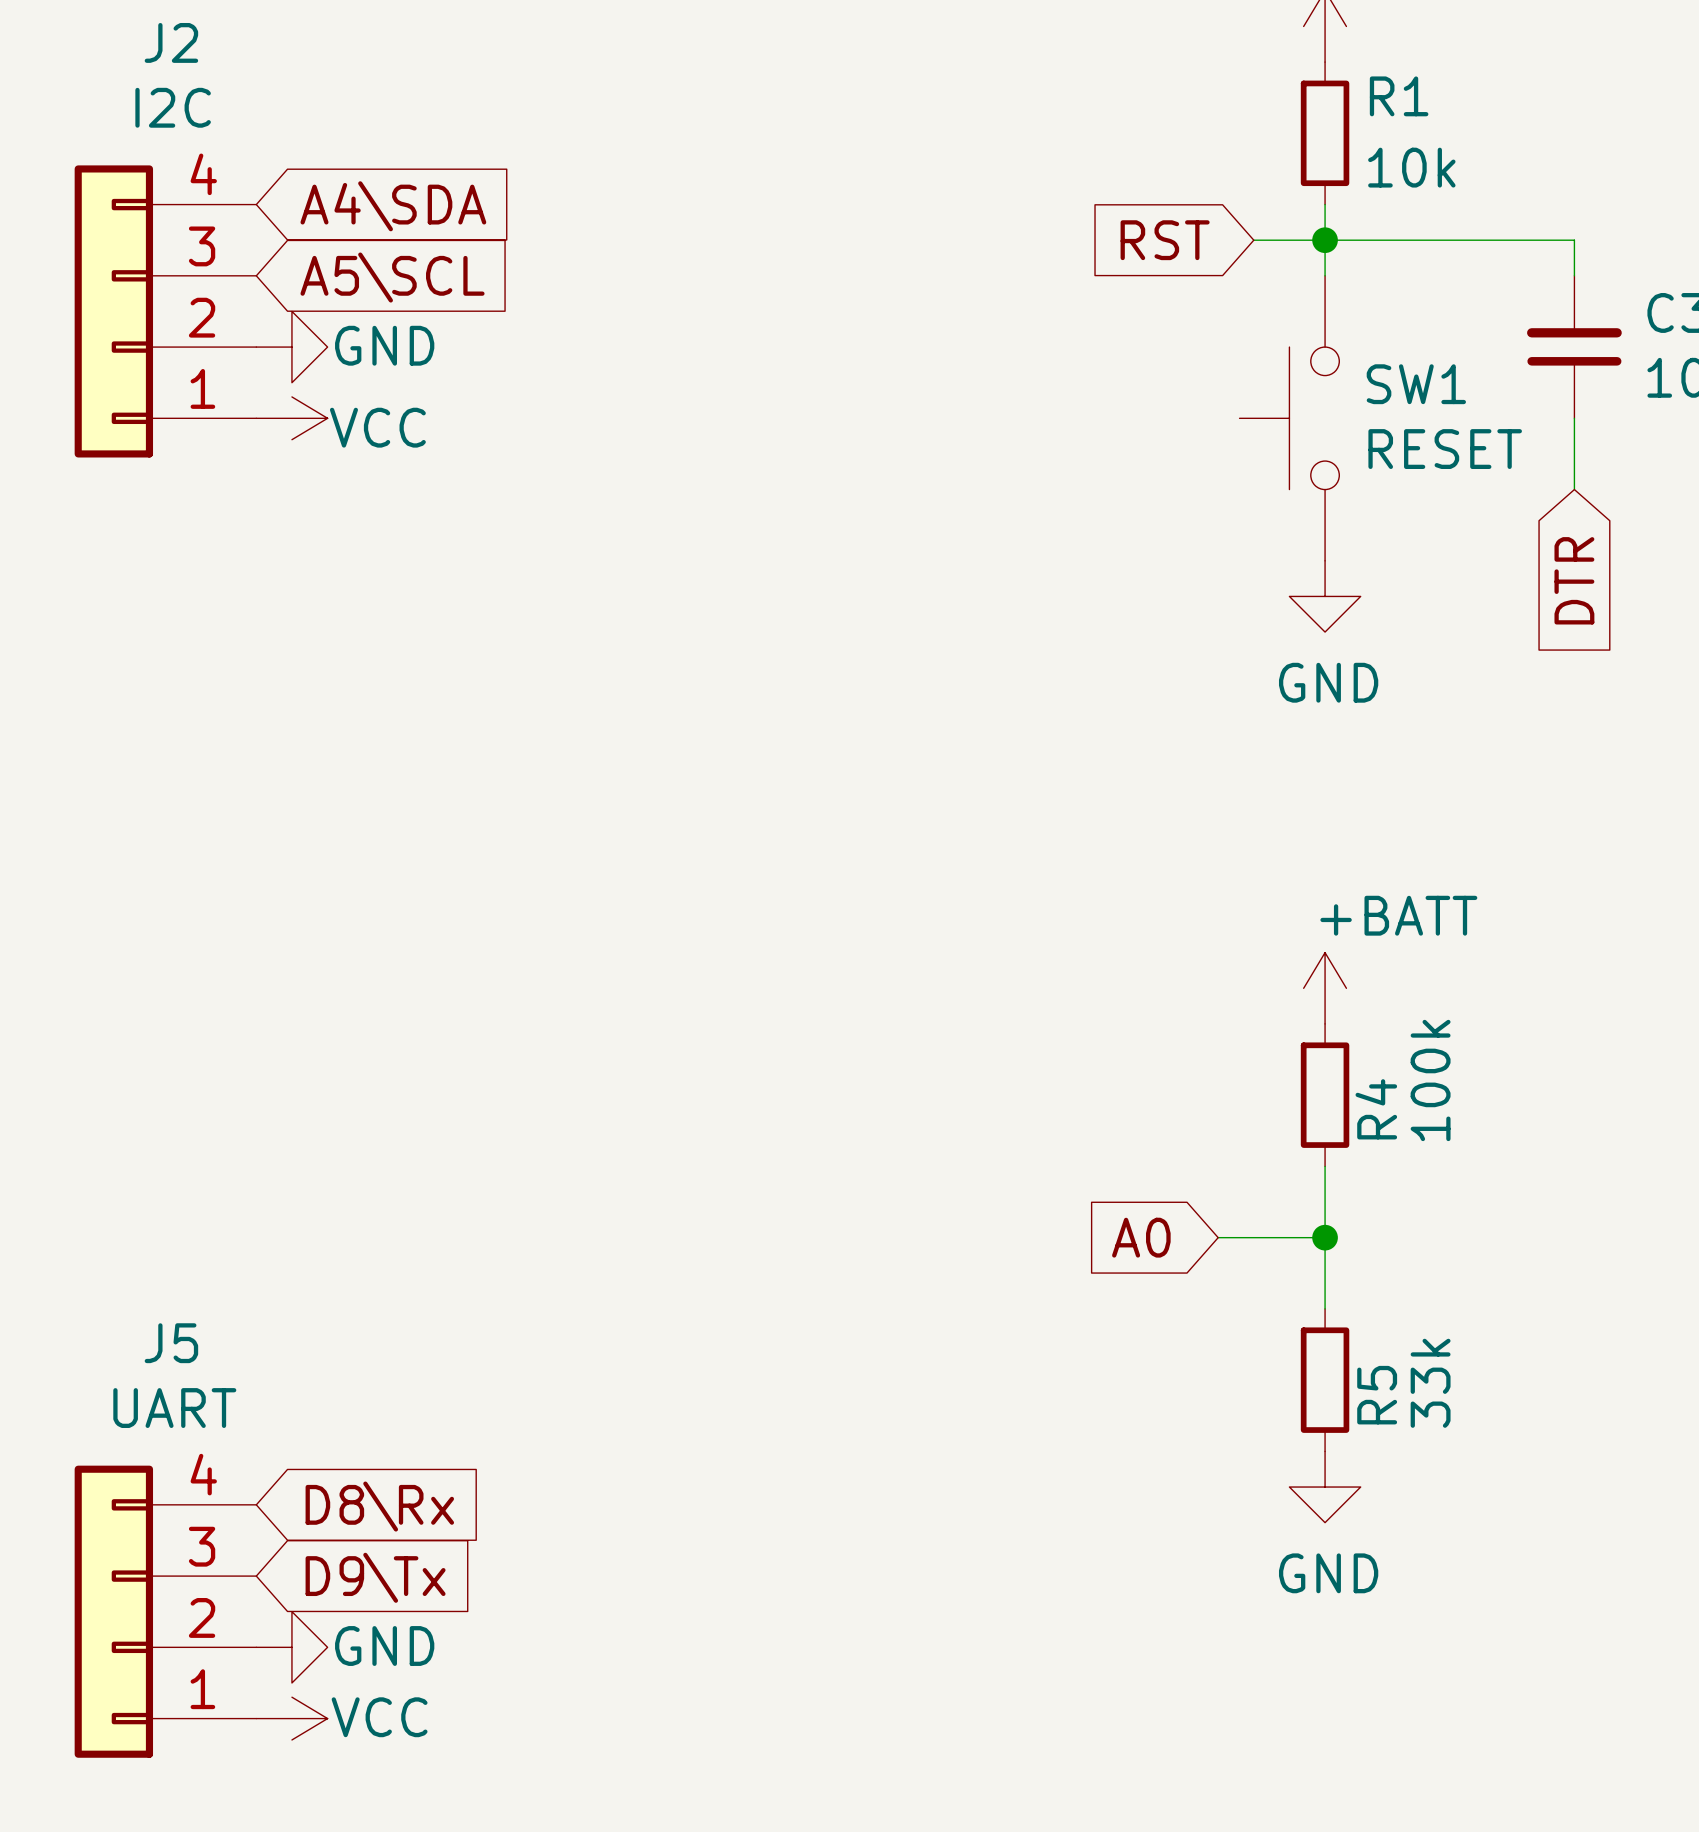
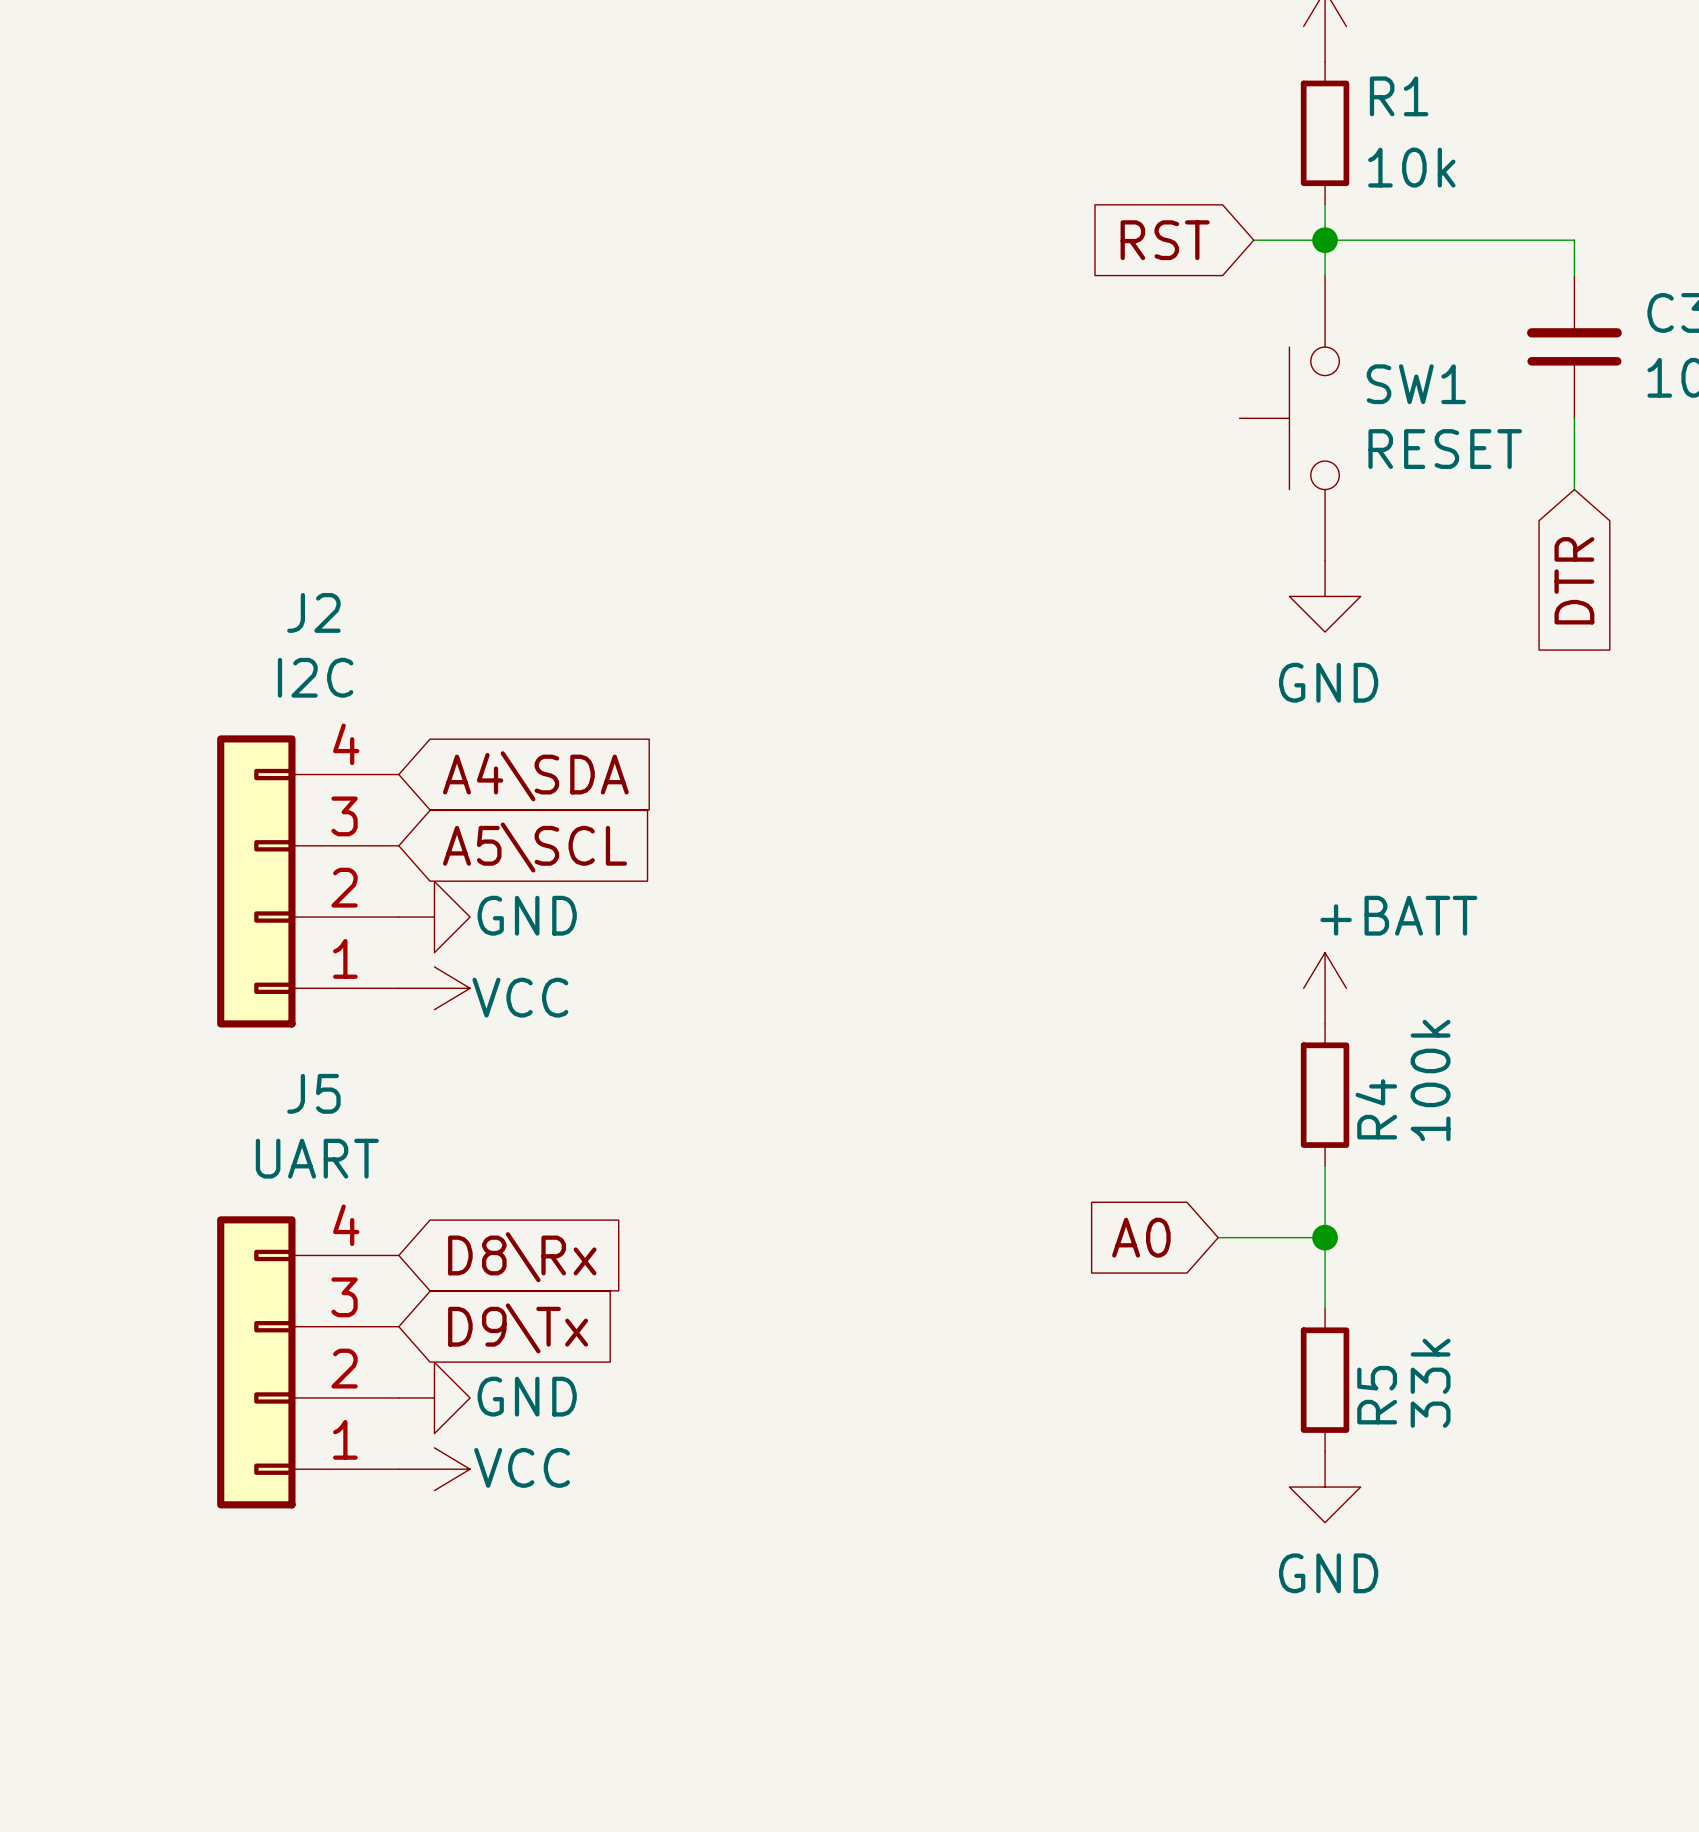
global label position: A4\SDA (393, 206) -> A4\SDA (535, 776)
global label position: A5\SCL (392, 277) -> A5\SCL (535, 847)
J2 position: (165, 311) -> (307, 881)
power symbol: GND (291, 347) -> none
power symbol: VCC (291, 418) -> none
power symbol: none -> GND (434, 917)
power symbol: none -> VCC (434, 988)
global label position: D8\Rx (379, 1506) -> D8\Rx (522, 1257)
global label position: D9\Tx (375, 1577) -> D9\Tx (518, 1328)
J5 position: (165, 1611) -> (307, 1362)
power symbol position: GND (291, 1647) -> GND (434, 1397)
power symbol position: VCC (291, 1718) -> VCC (434, 1469)

